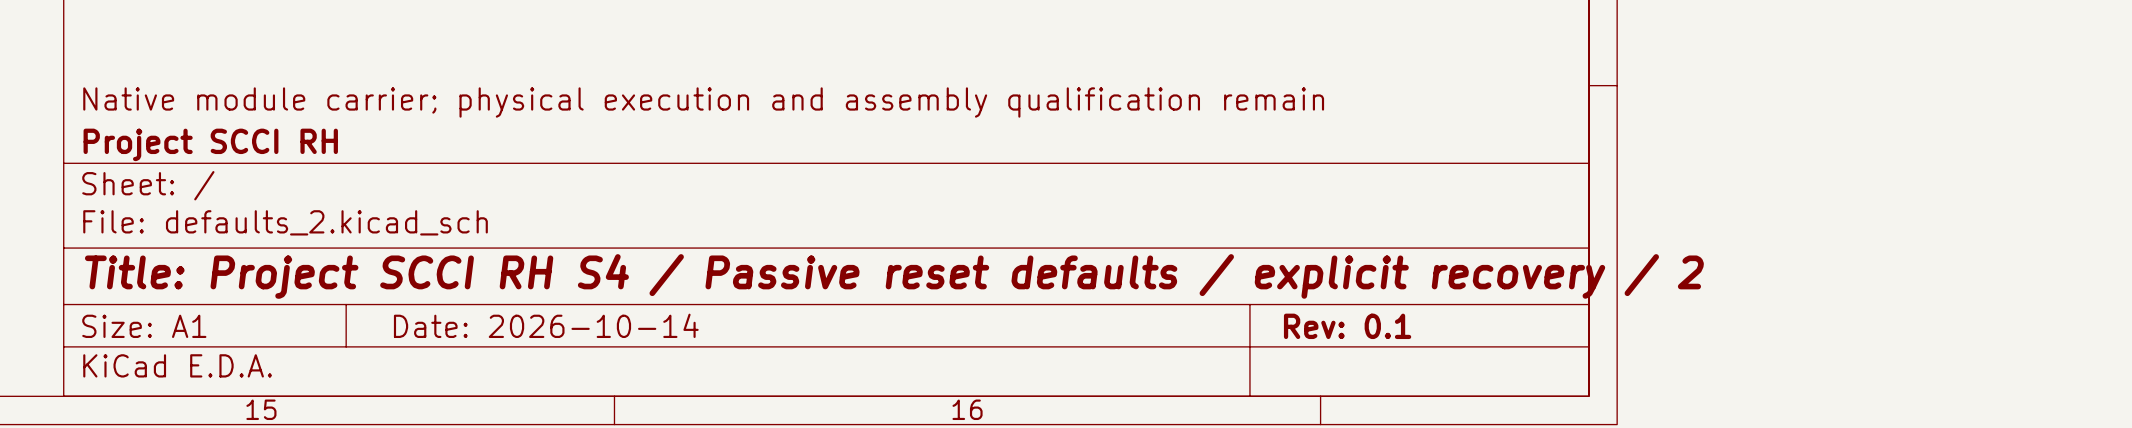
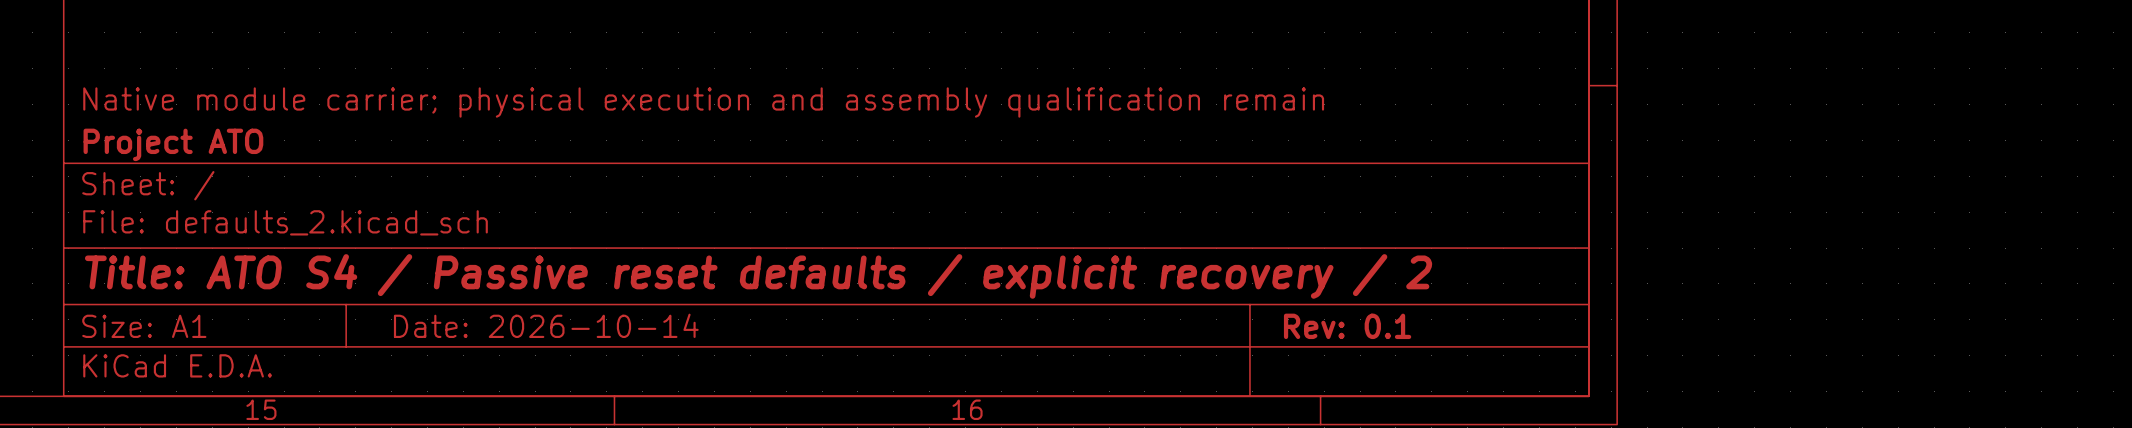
title block: Project SCCI RH (210, 144) -> Project ATO (173, 144)
title block: Title: Project SCCI RH S4 / Passive reset defaults / explicit recovery / 2 (894, 276) -> Title: ATO S4 / Passive reset defaults / explicit recovery / 2 (758, 276)

